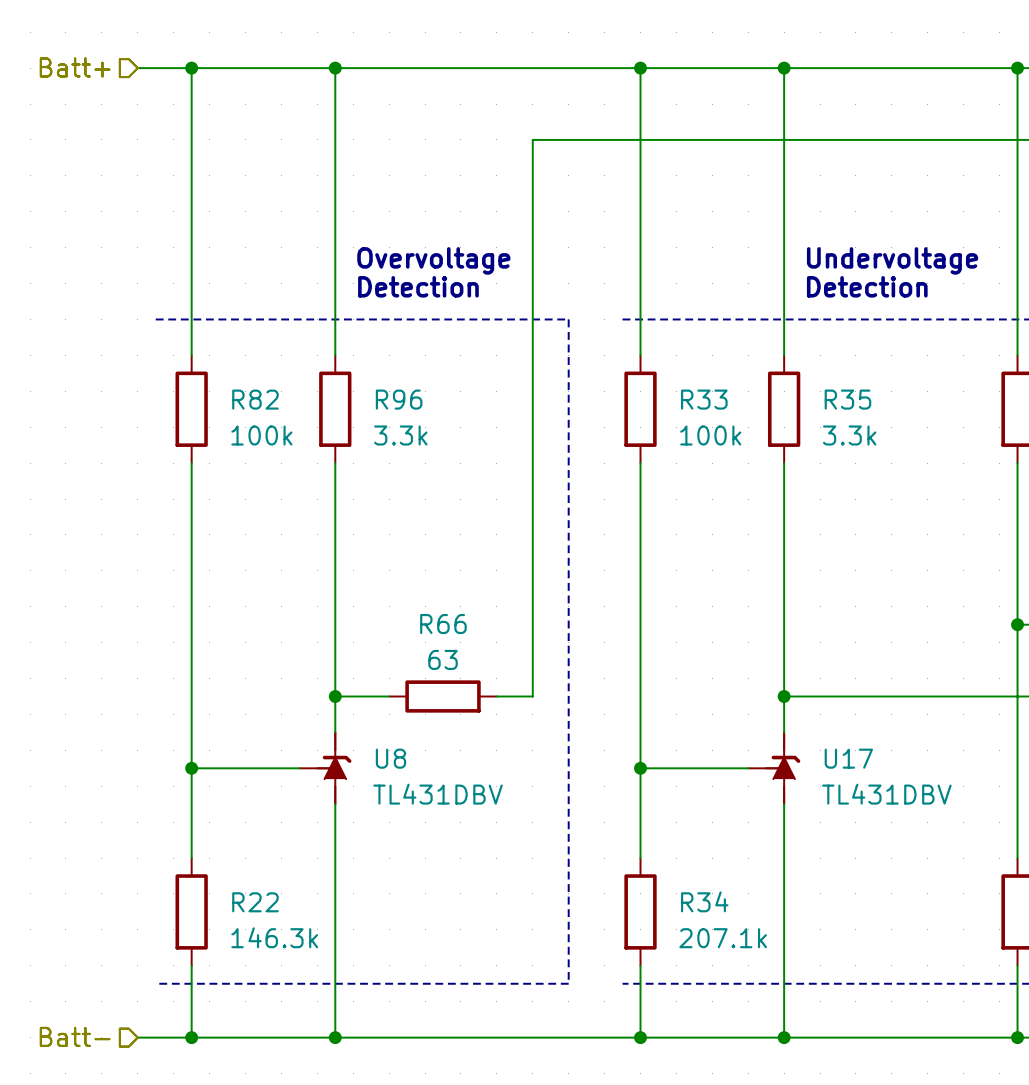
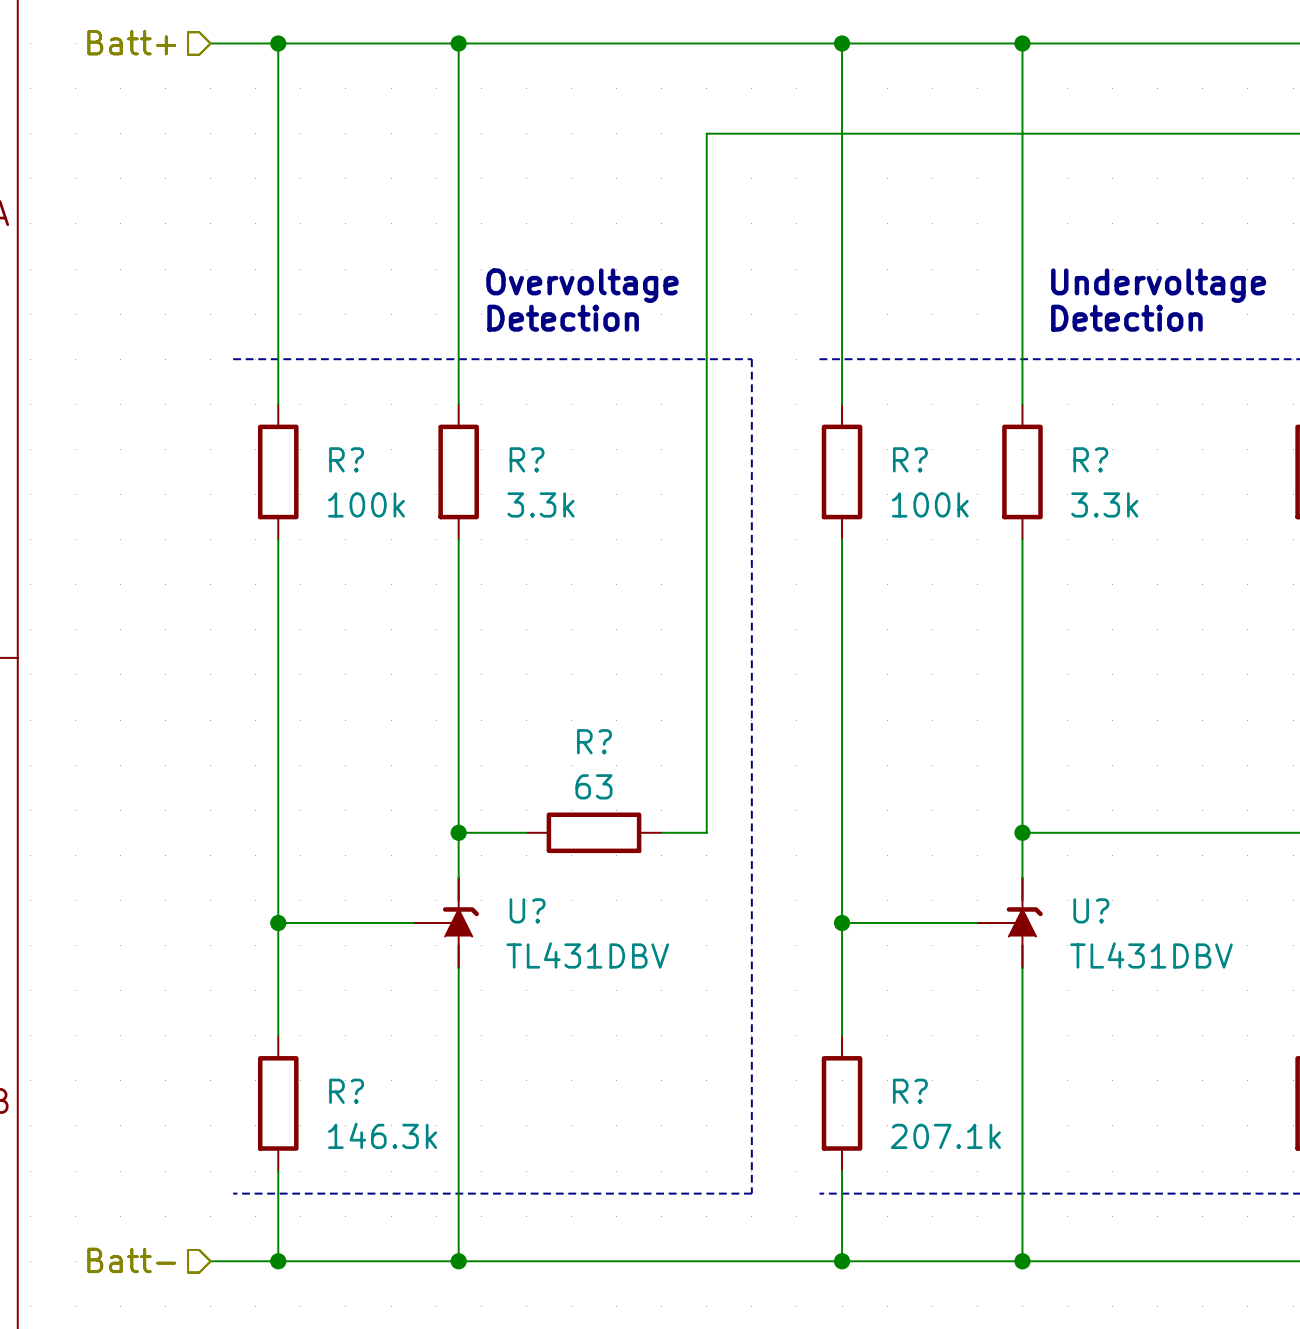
R82 name: R82 (255, 399) -> R? (346, 459)
R96 name: R96 (399, 399) -> R? (527, 459)
R33 name: R33 (704, 399) -> R? (910, 459)
R35 name: R35 (847, 399) -> R? (1090, 459)
R66 name: R66 (443, 624) -> R? (594, 741)
U8 name: U8 (391, 758) -> U? (527, 910)
U17 name: U17 (848, 758) -> U? (1091, 910)
R34 name: R34 (704, 901) -> R? (910, 1091)
R22 name: R22 (255, 902) -> R? (346, 1091)

